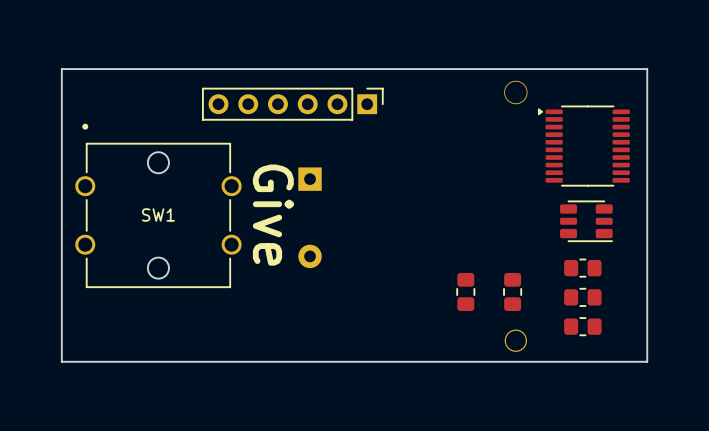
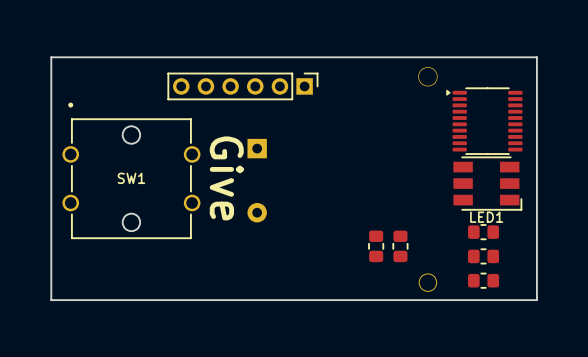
part: (586, 221) -> none
LED1: none -> (487, 183)
part: (582, 268) -> none
part: none -> (483, 232)
part: (465, 291) -> none
part: (512, 291) -> none
part: none -> (376, 246)
part: none -> (400, 246)
part: (582, 297) -> none
part: none -> (483, 256)
part: (582, 326) -> none
part: none -> (483, 280)

